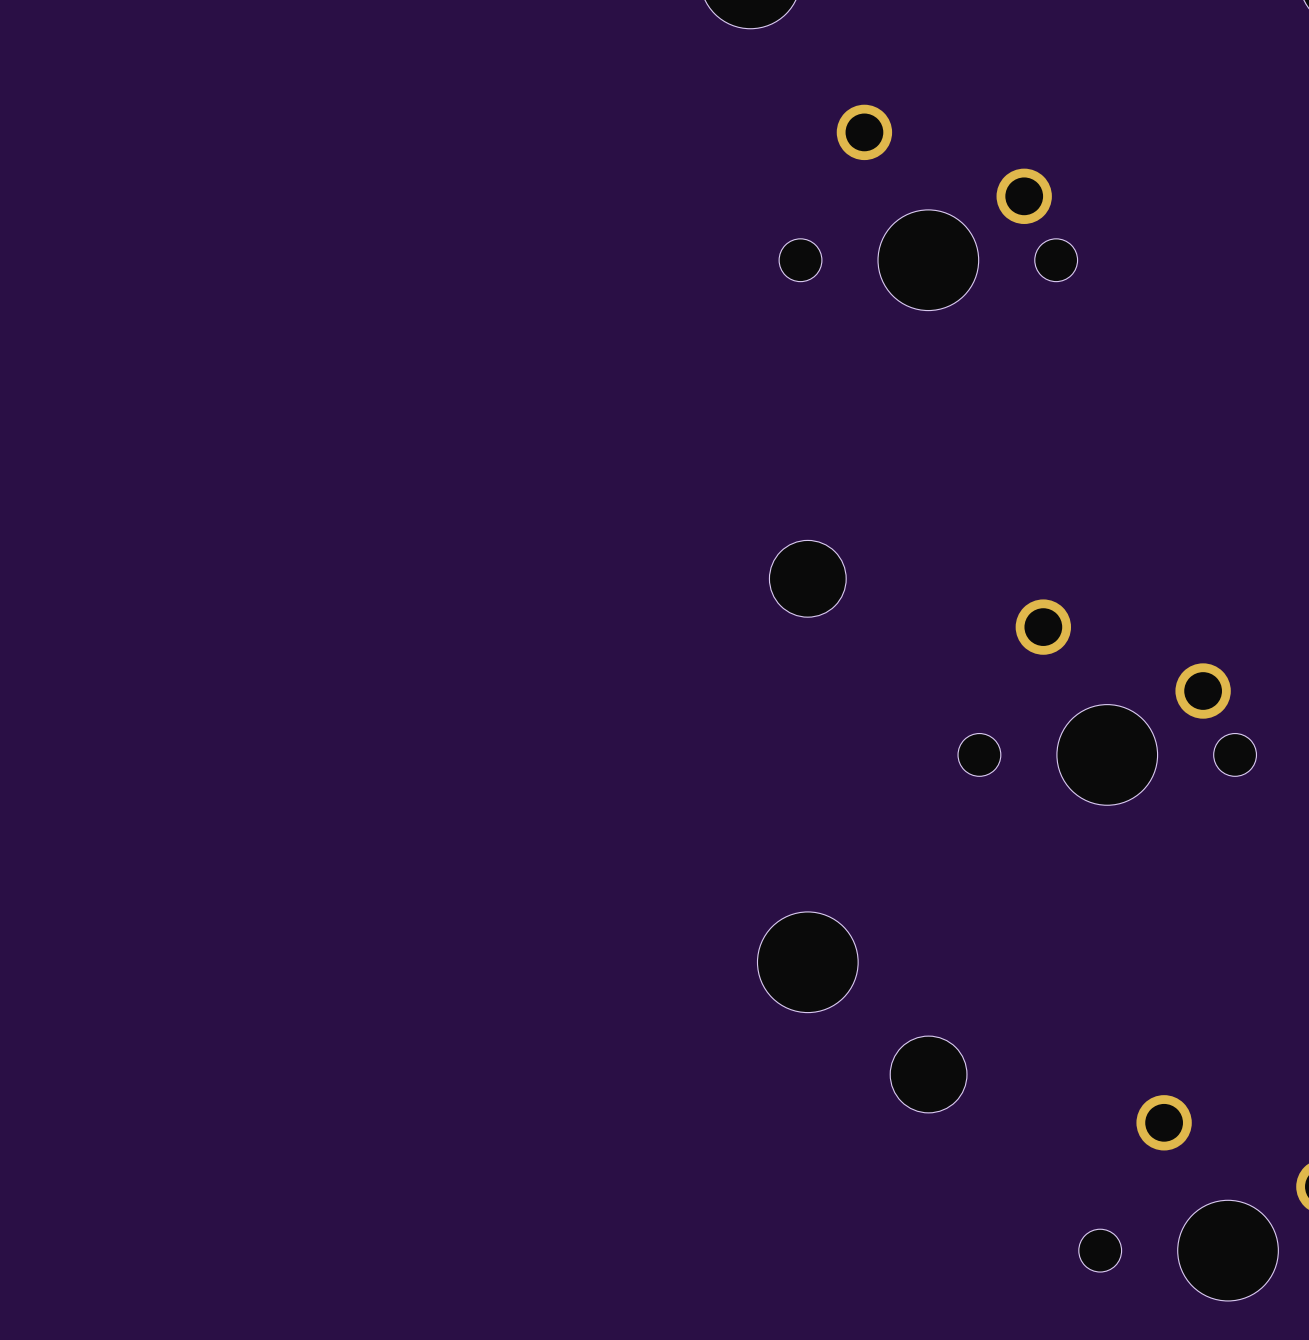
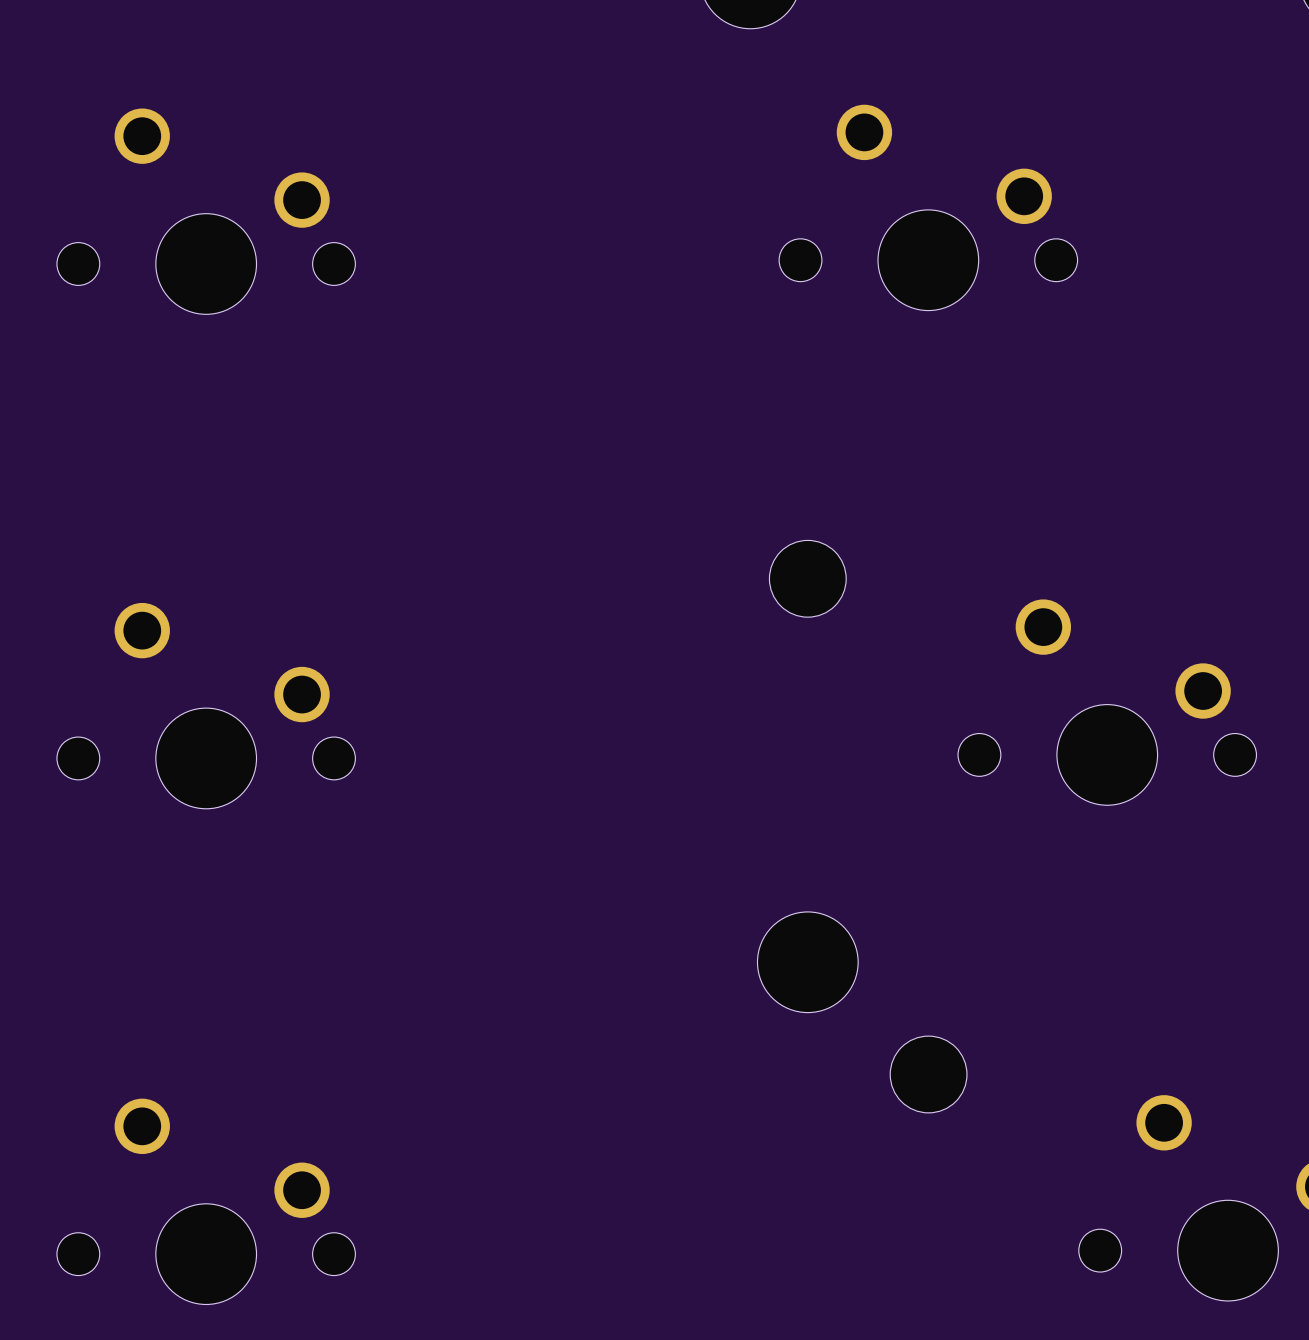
part: none -> (206, 211)
part: none -> (206, 705)
part: none -> (206, 1201)

